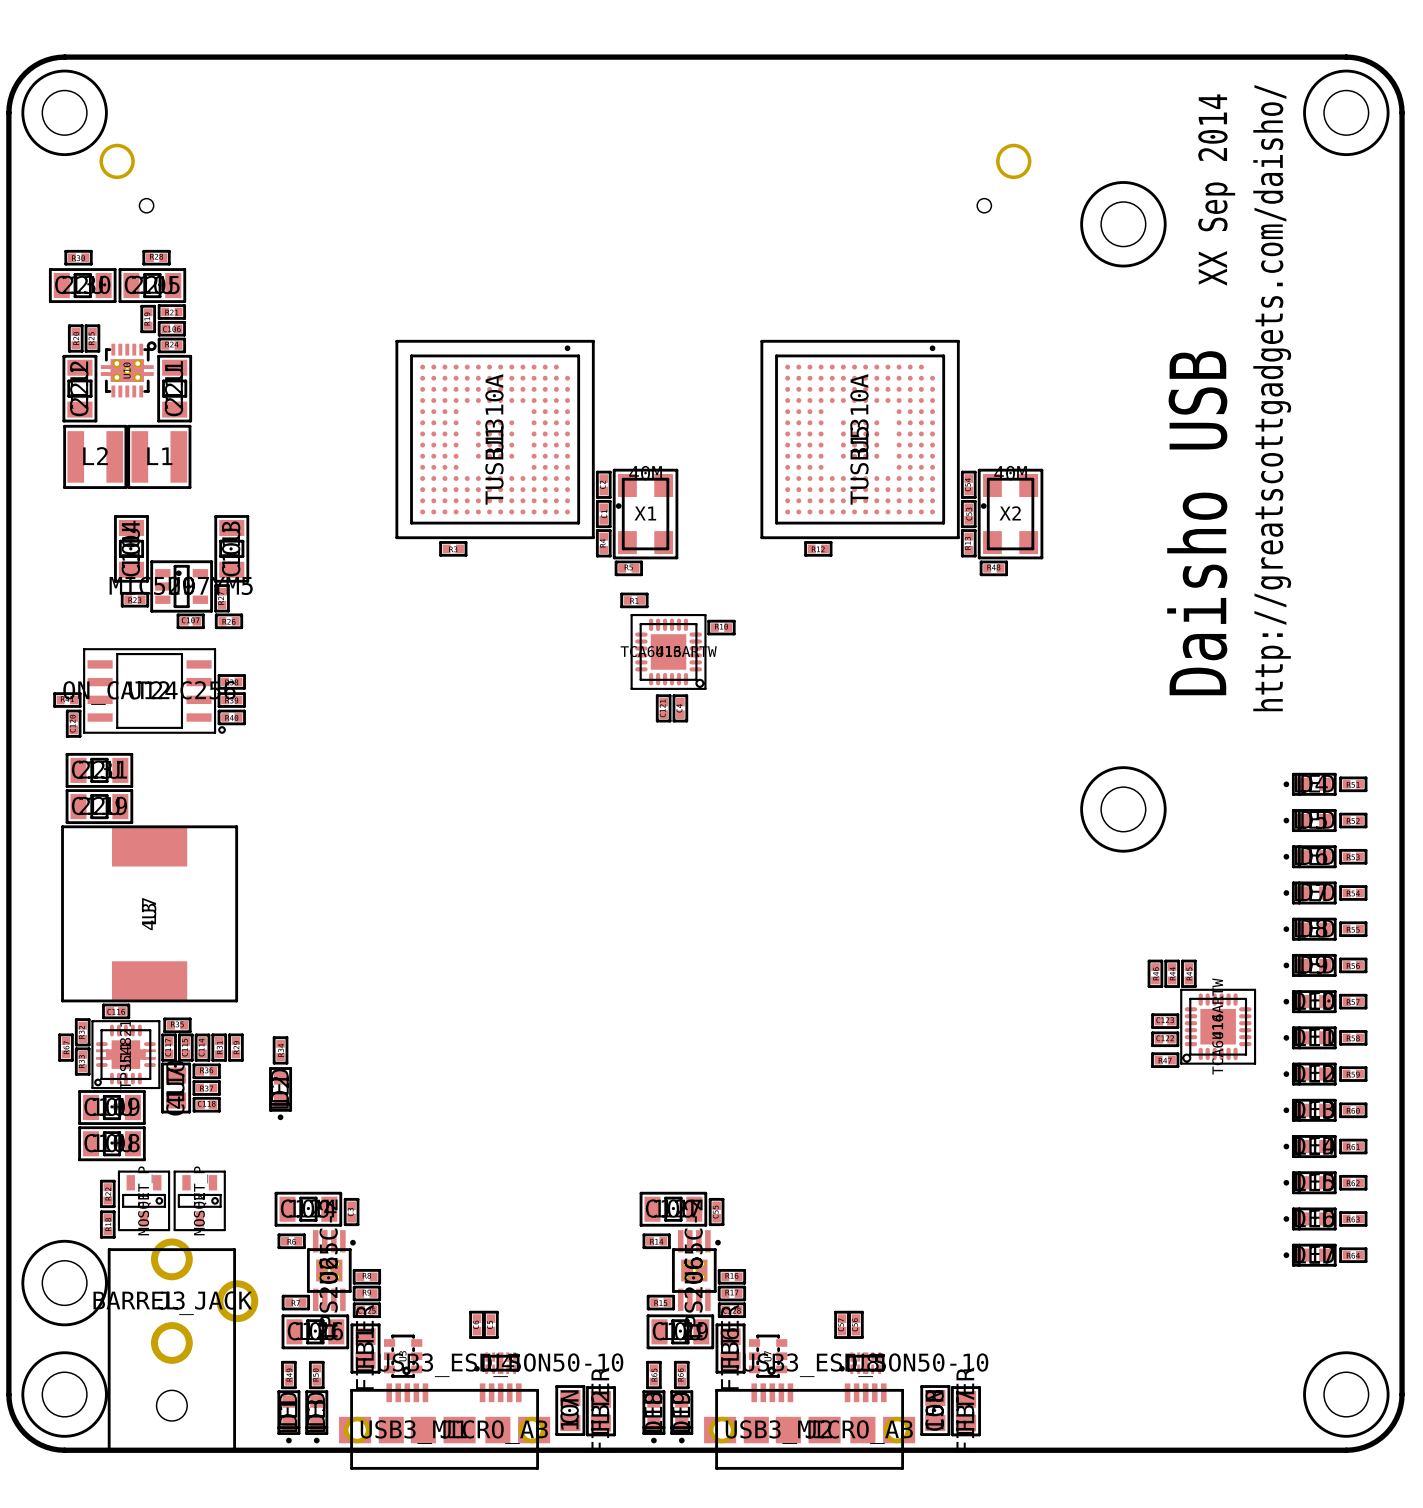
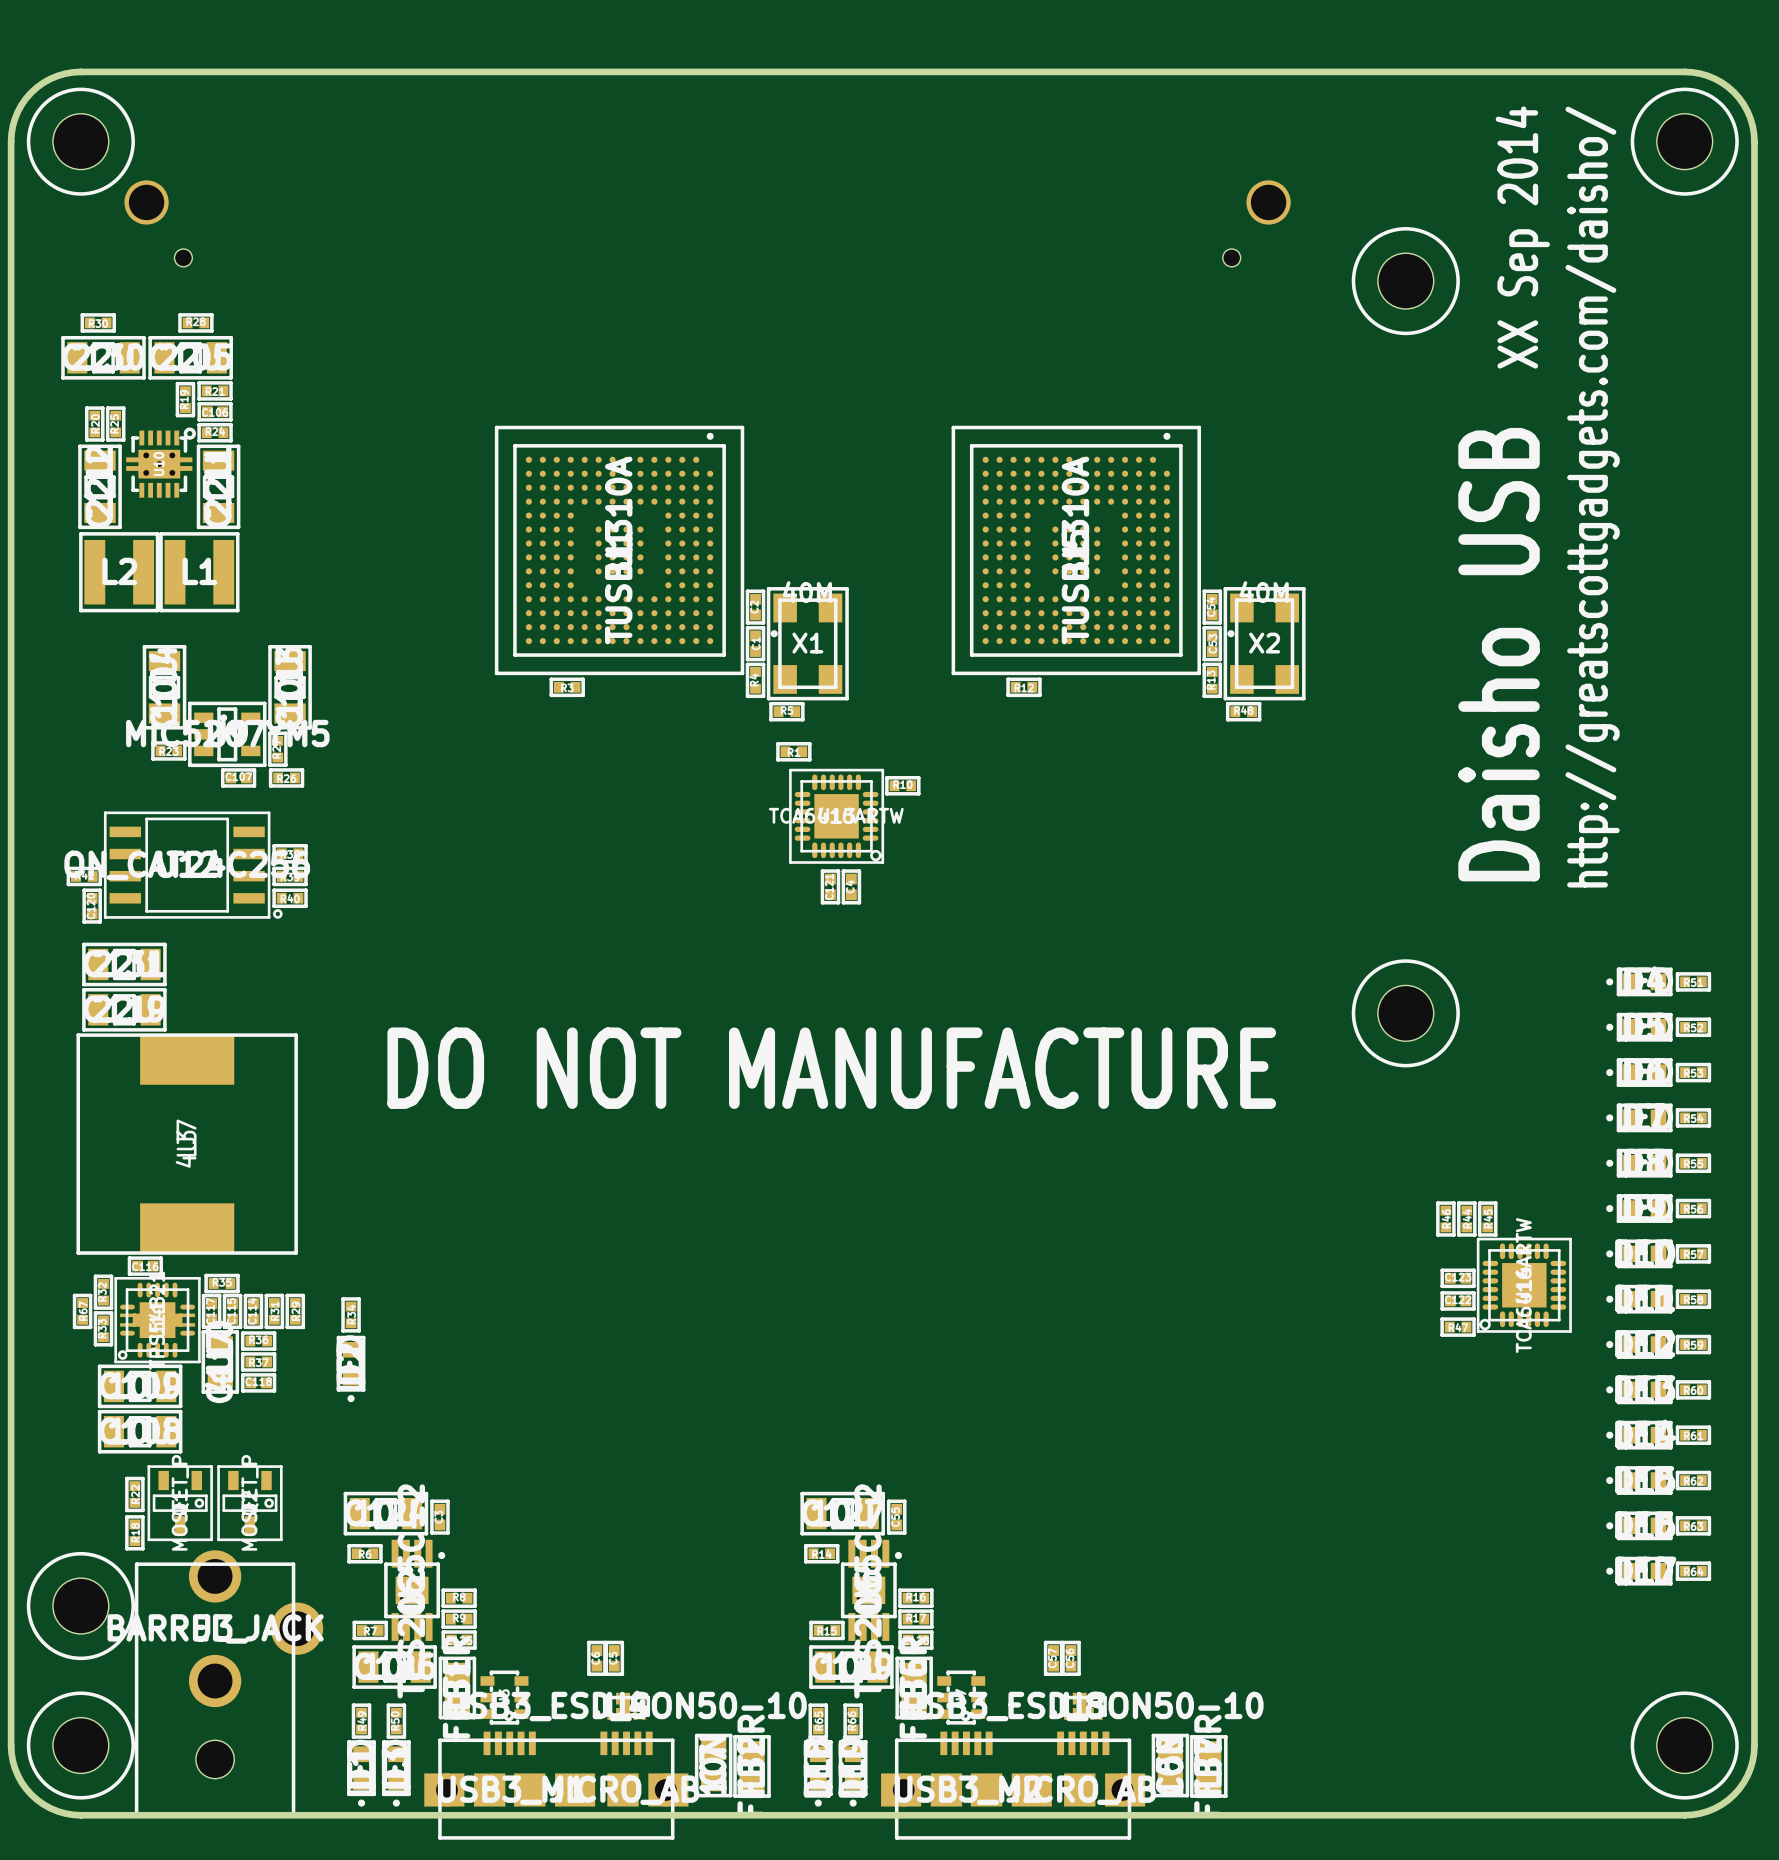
text: none -> DO NOT MANUFACTURE (831, 1068)

